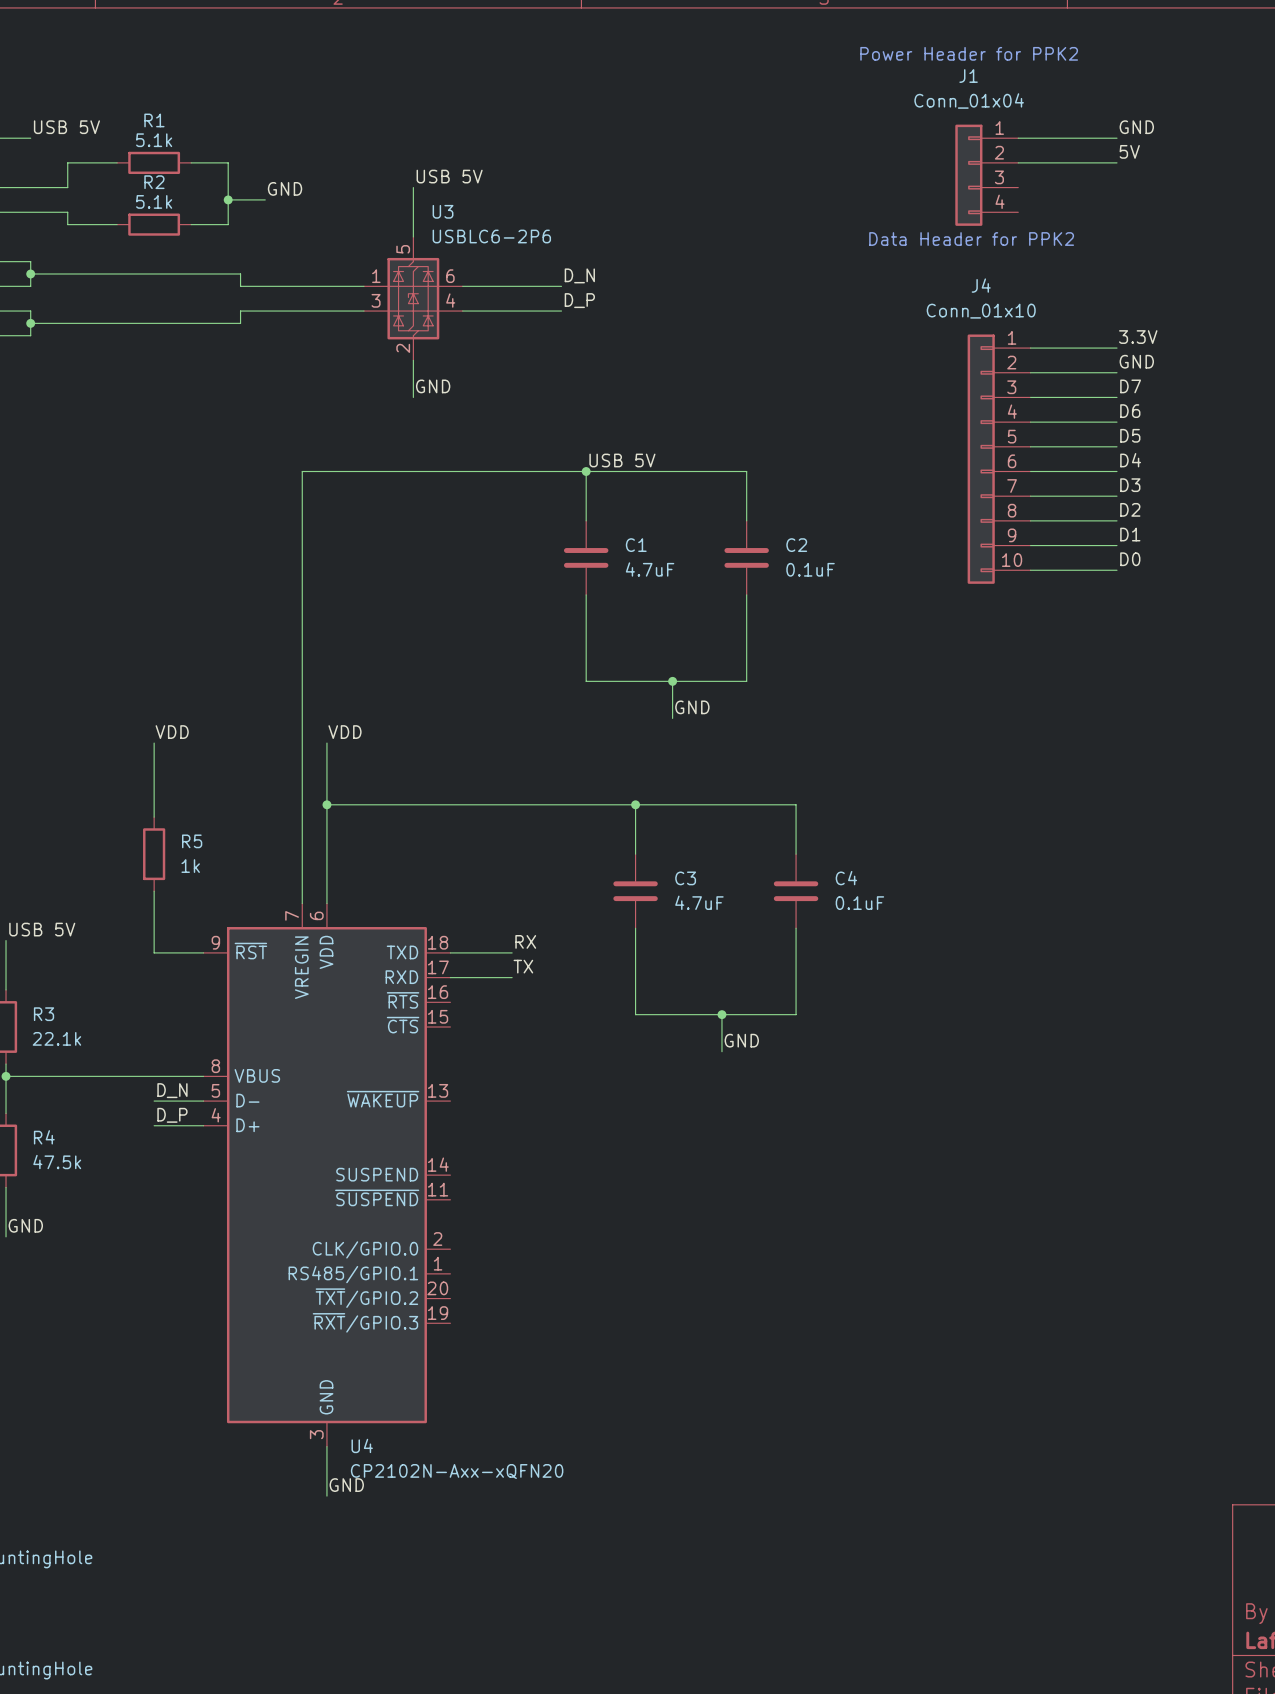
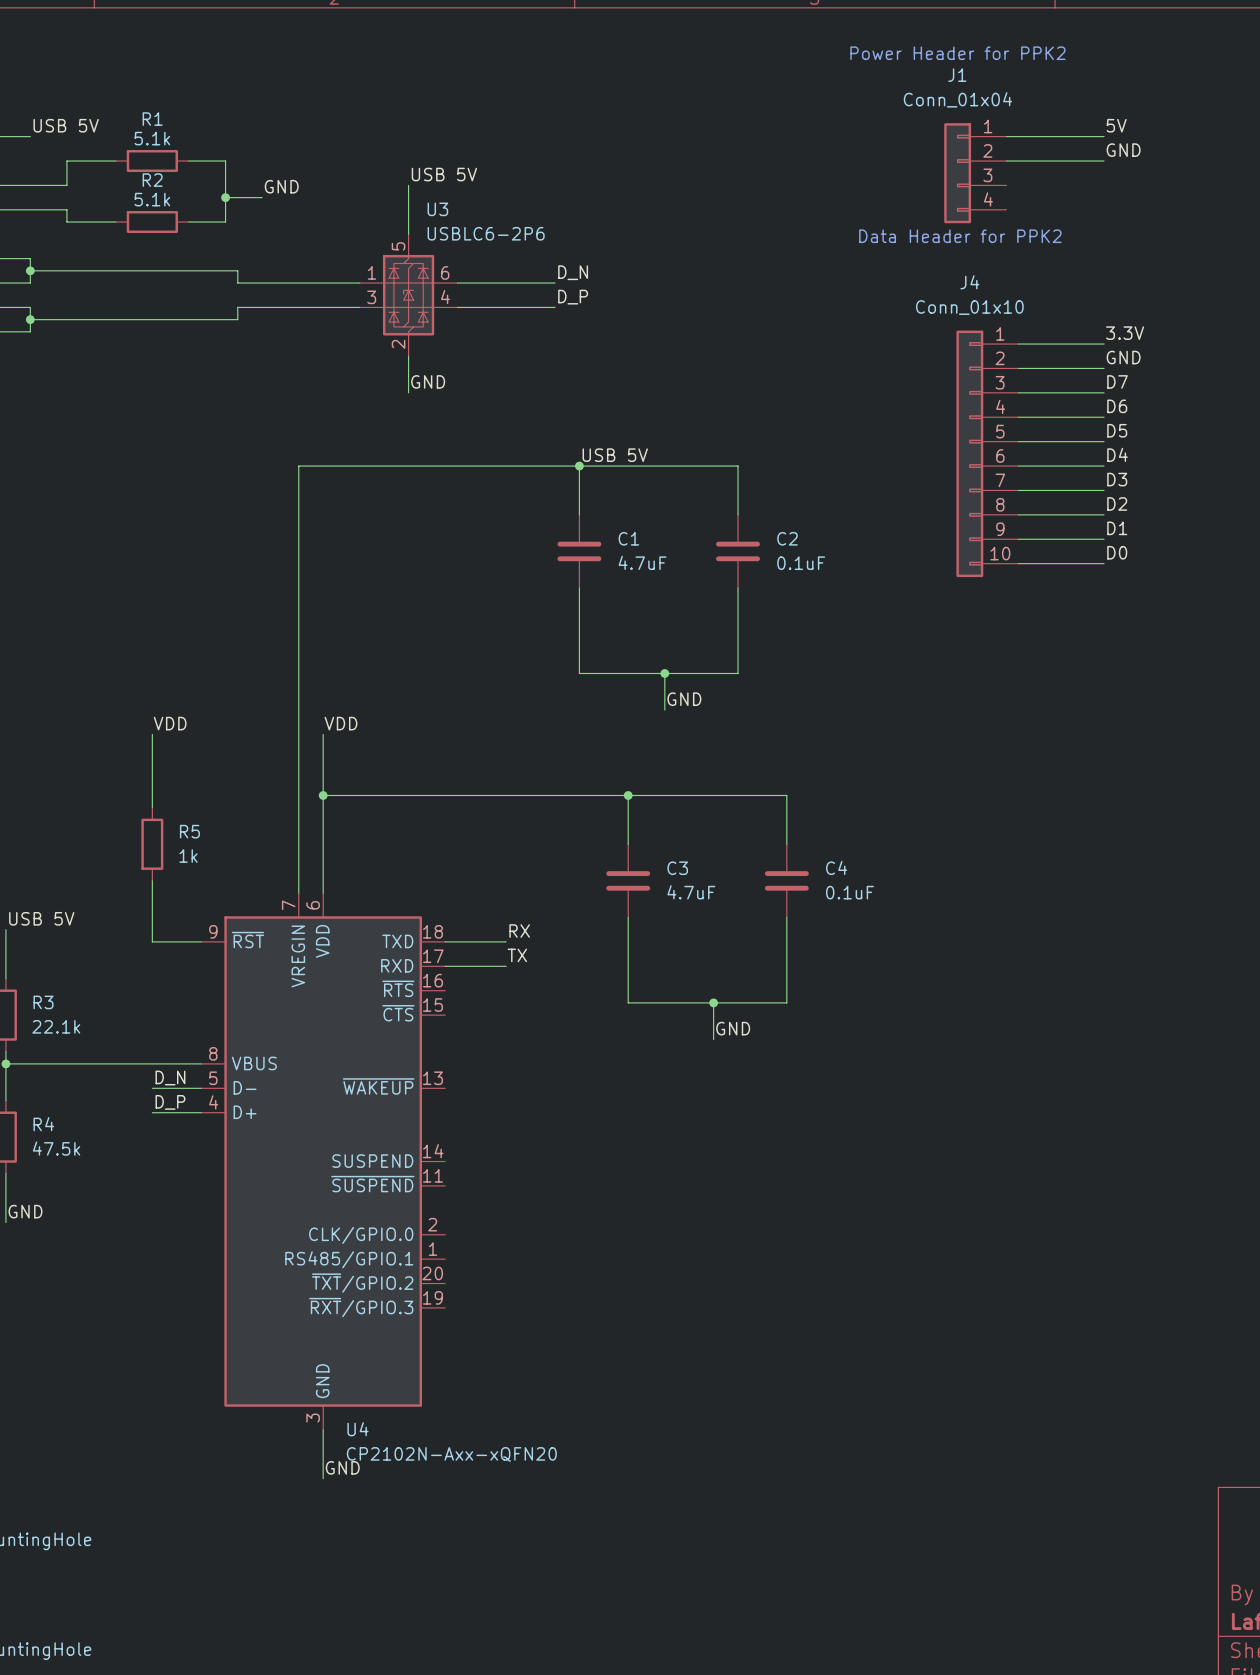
label: GND (1136, 127) -> 5V (1116, 125)
label: 5V (1129, 151) -> GND (1123, 150)

